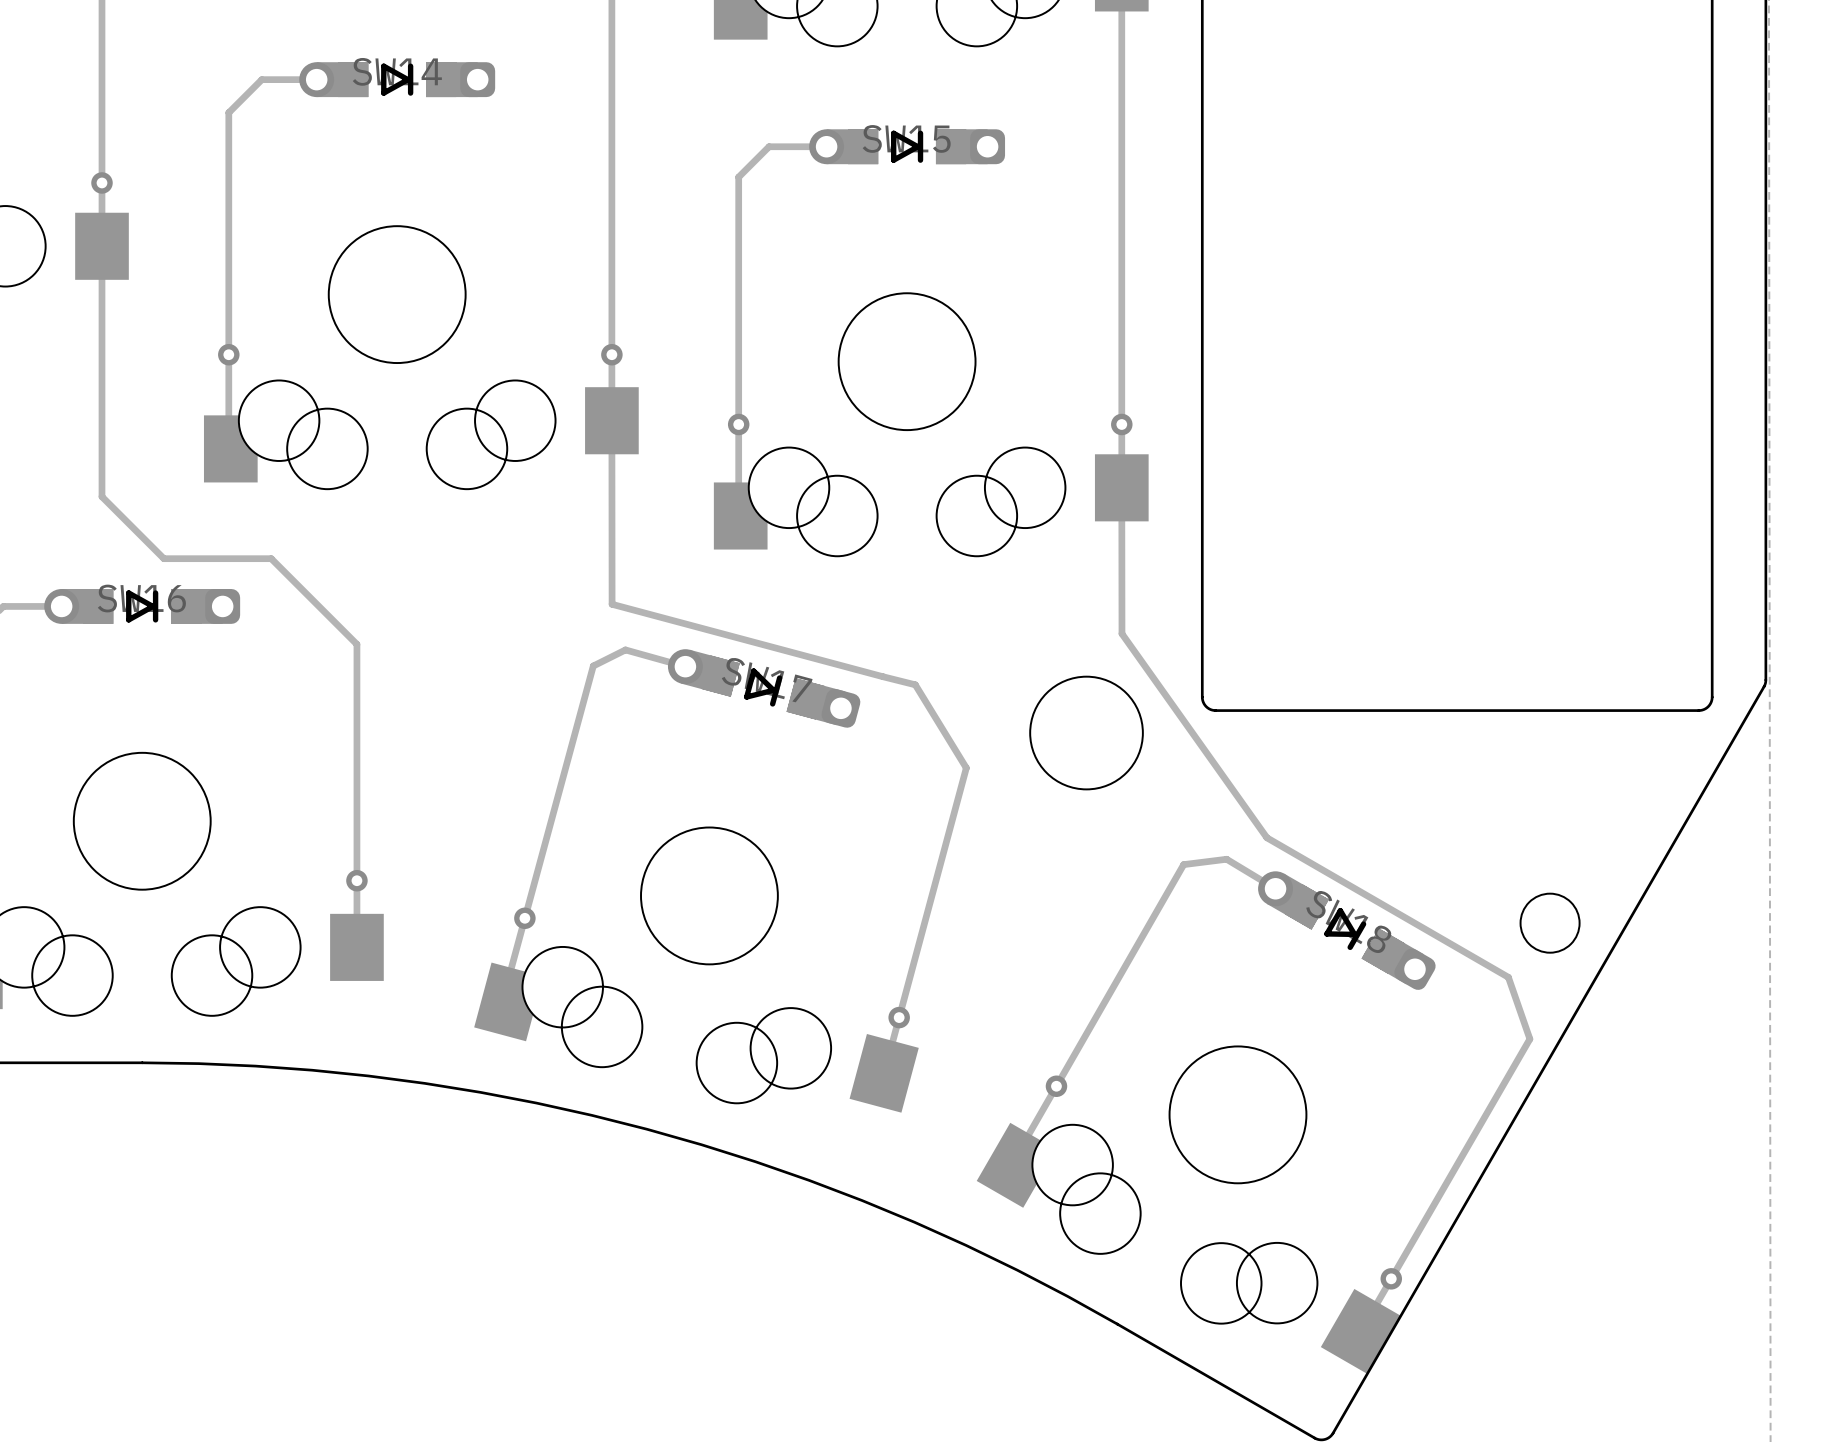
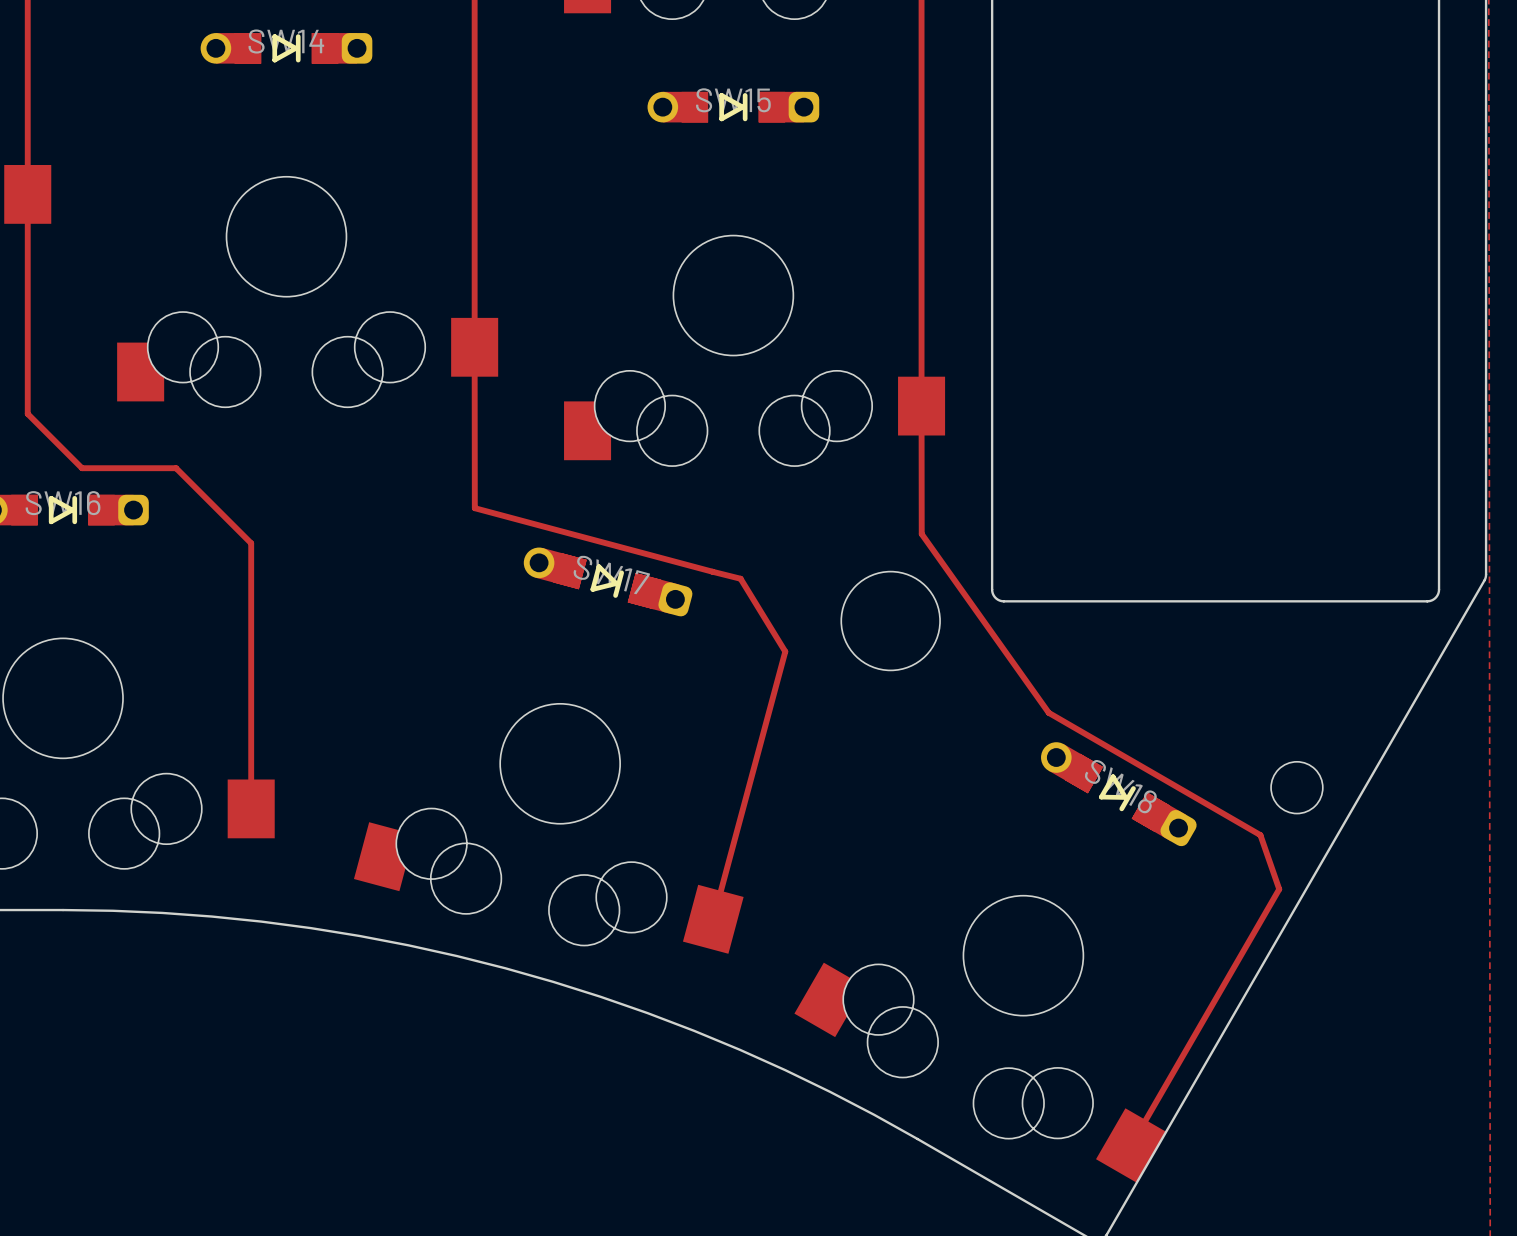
track: (316, 79) (261, 79) (228, 112) (228, 446) (230, 448) -> none
track: (826, 146) (769, 146) (738, 177) (738, 513) (740, 515) -> none
via: (101, 182) -> none
via: (228, 354) -> none
via: (611, 354) -> none
via: (738, 424) -> none
via: (1121, 424) -> none
track: (685, 666) (625, 649) (593, 666) (507, 982) (508, 1001) -> none
via: (356, 880) -> none
track: (1275, 888) (1226, 859) (1183, 864) (1017, 1154) (1016, 1165) -> none
via: (524, 918) -> none
via: (899, 1017) -> none
via: (1056, 1086) -> none
via: (1391, 1278) -> none

